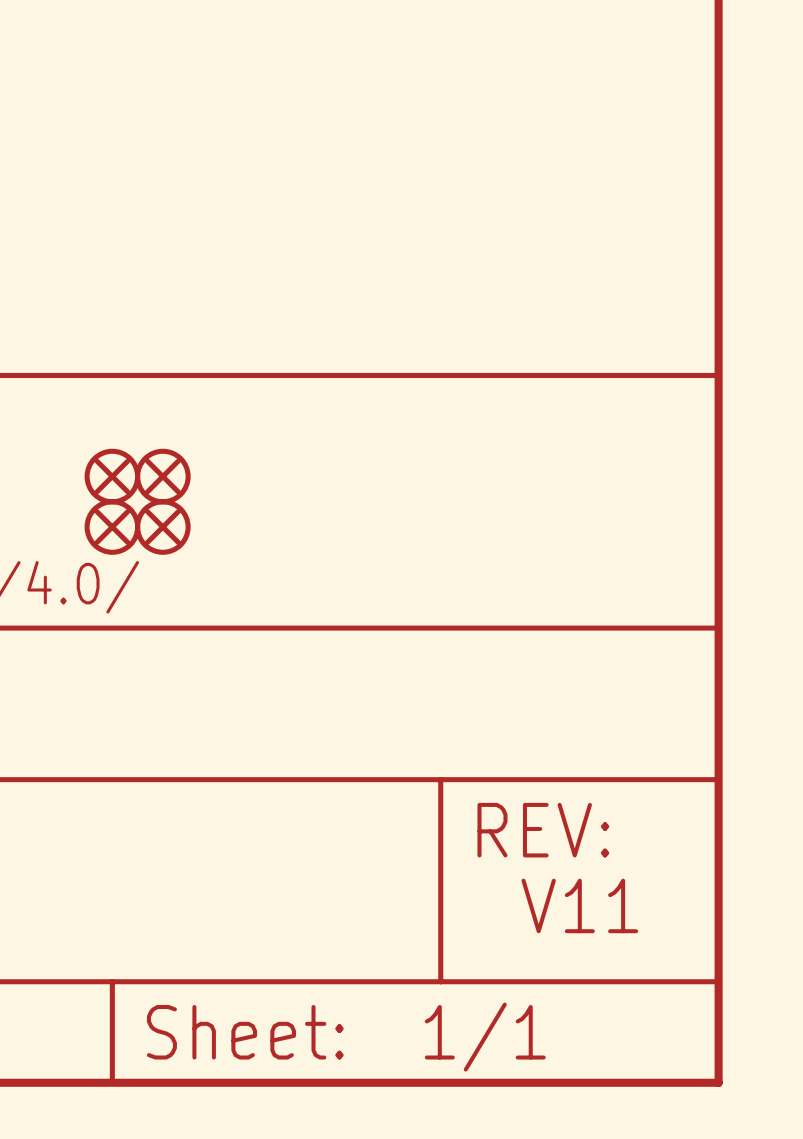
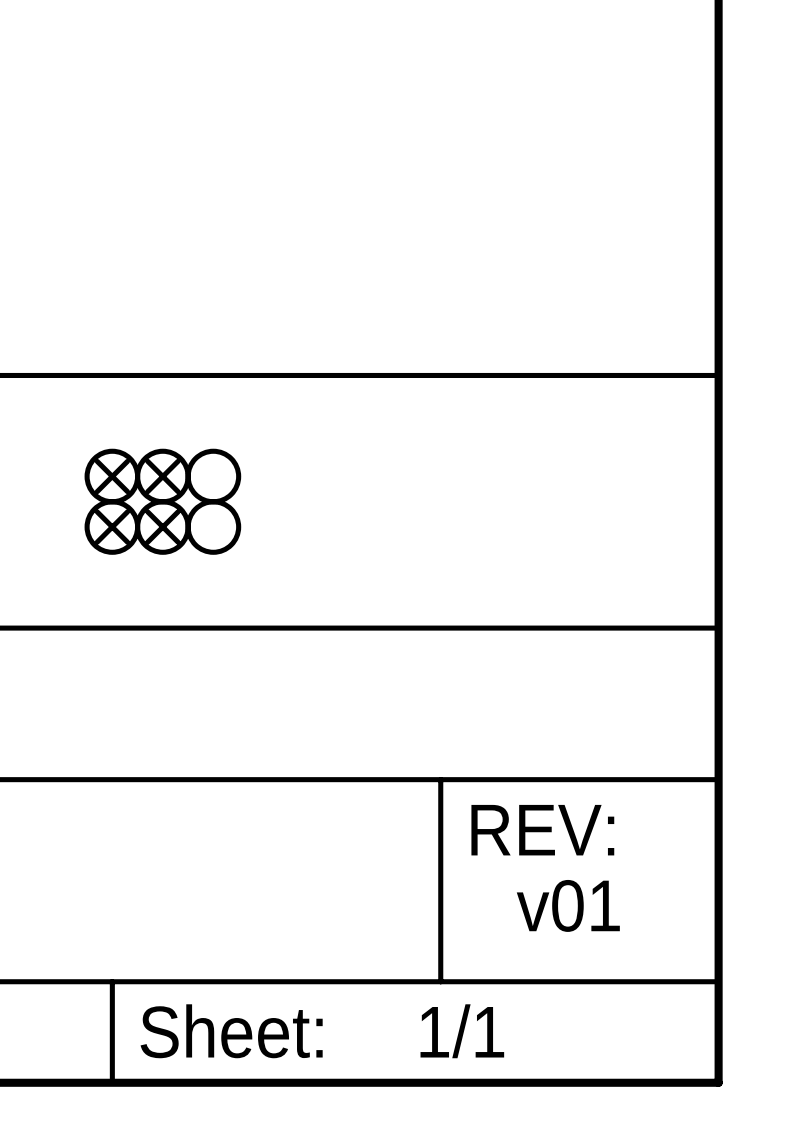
part: none -> (213, 476)
part: none -> (213, 527)
text: V11 (579, 905) -> v01 (568, 905)

